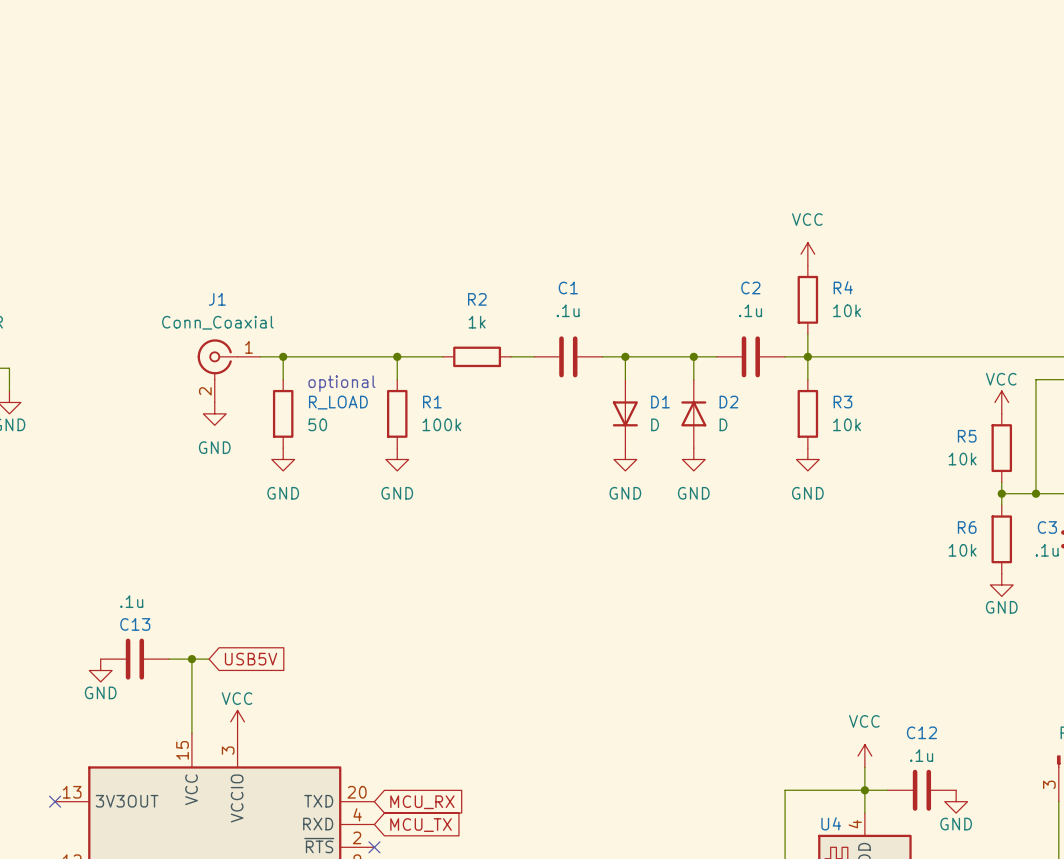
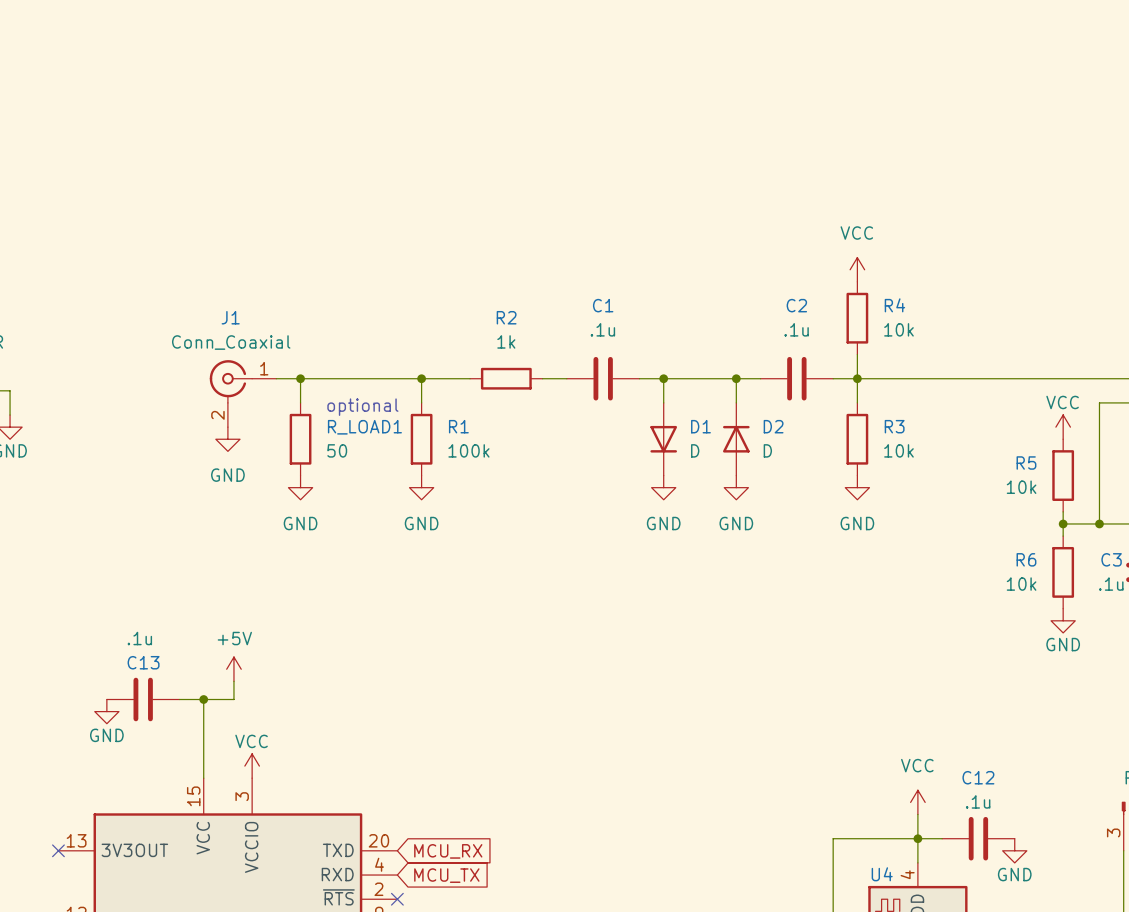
R_LOAD name: R_LOAD (338, 402) -> R_LOAD1 (364, 427)
power symbol: none -> +5V (233, 669)
wire: none -> (233, 681) (233, 699) (221, 699)
global label: USB5V (251, 659) -> none

